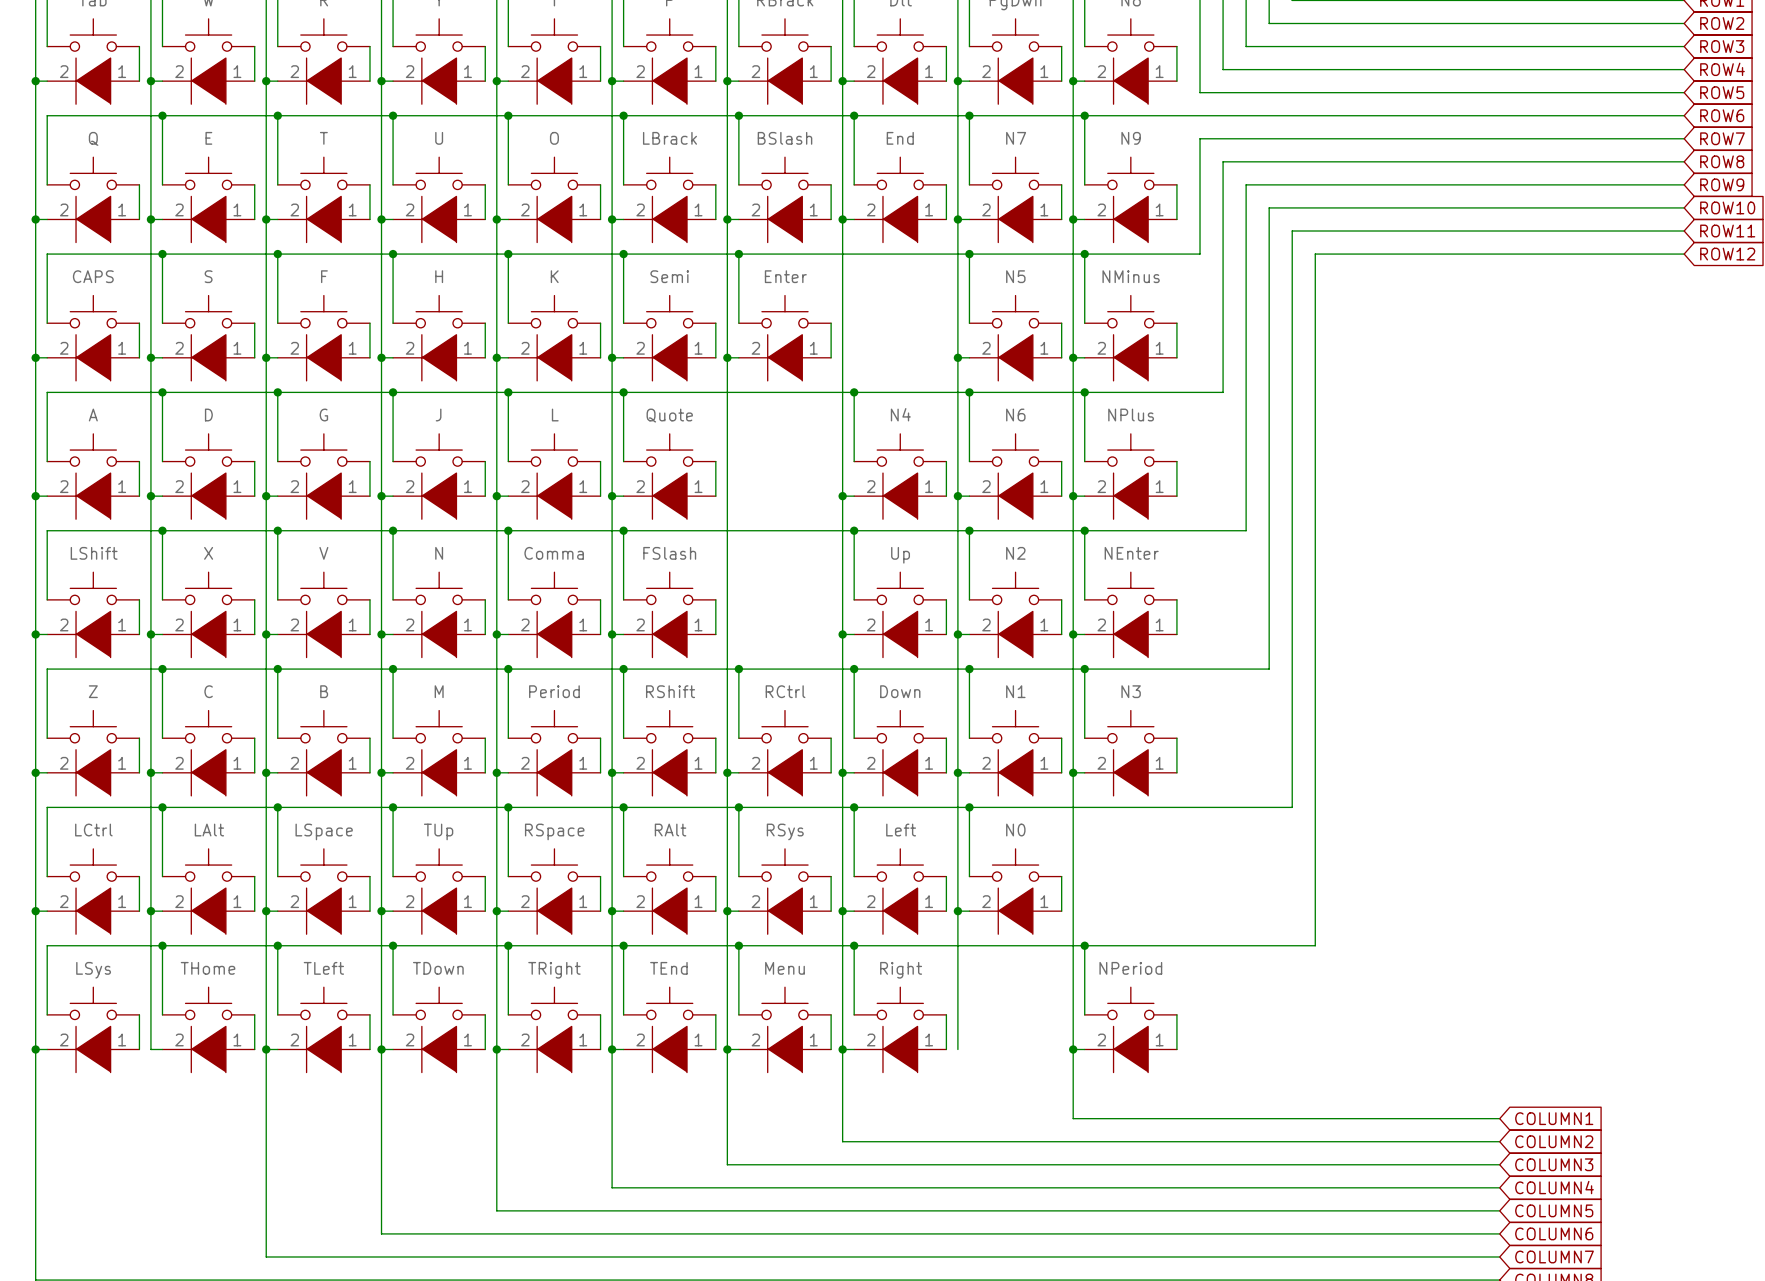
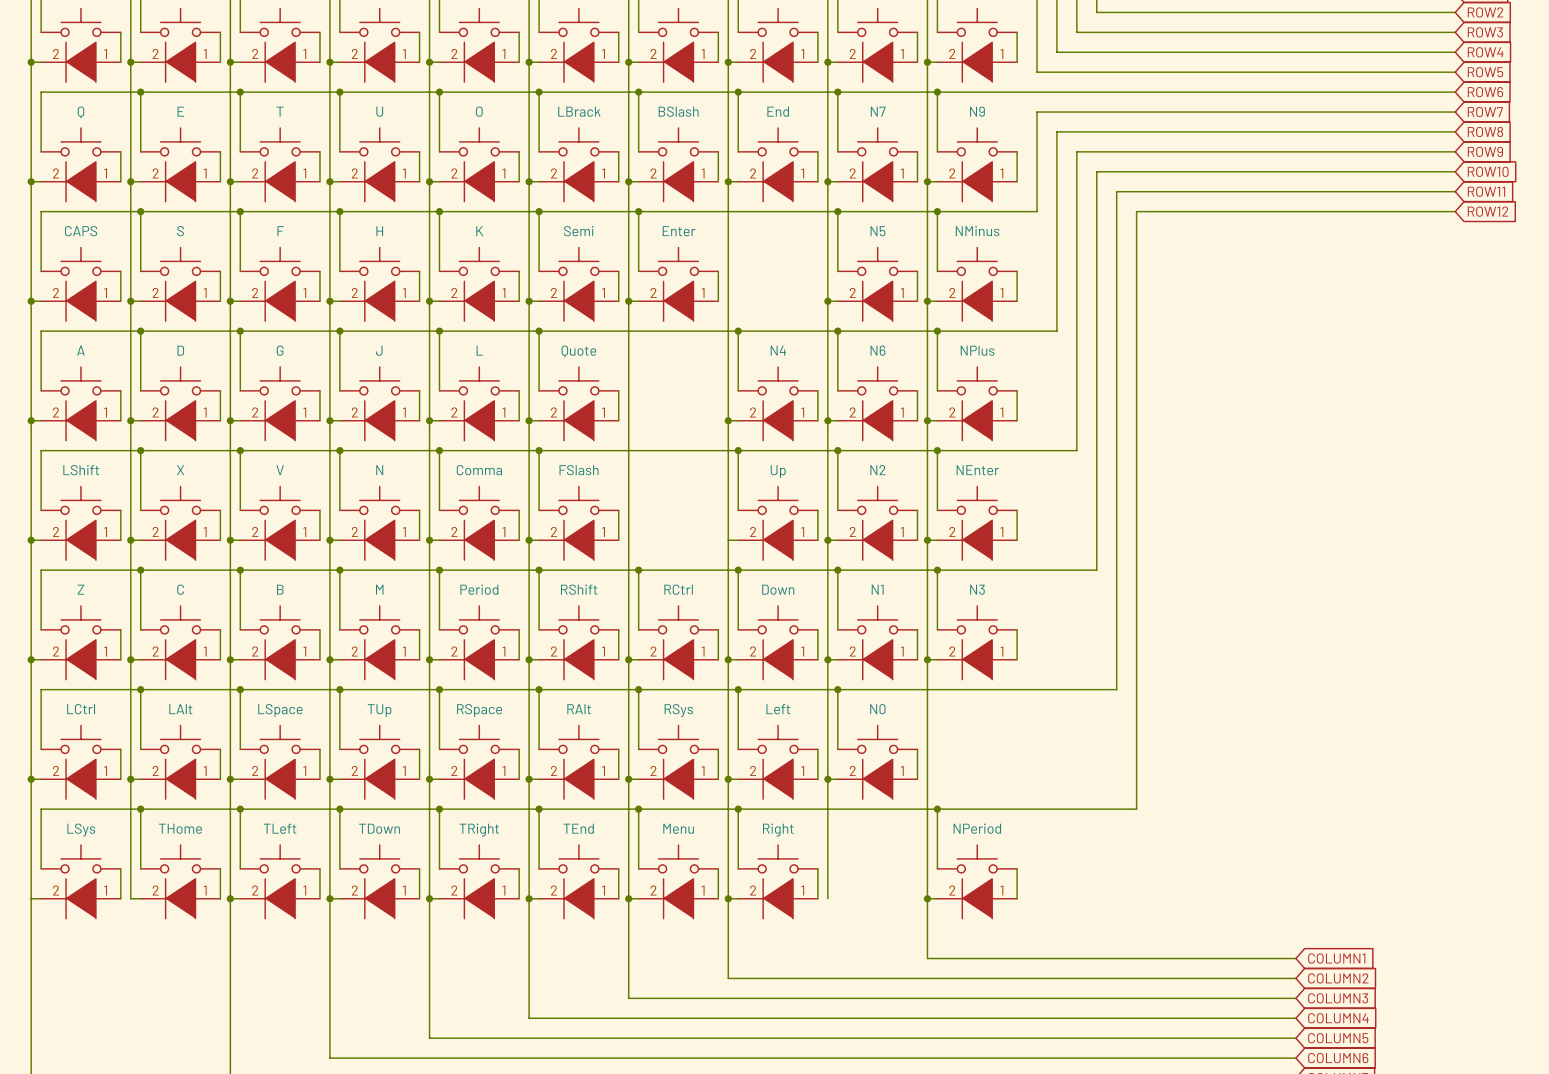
junction: (842, 634) -> none
junction: (35, 1049) -> none

